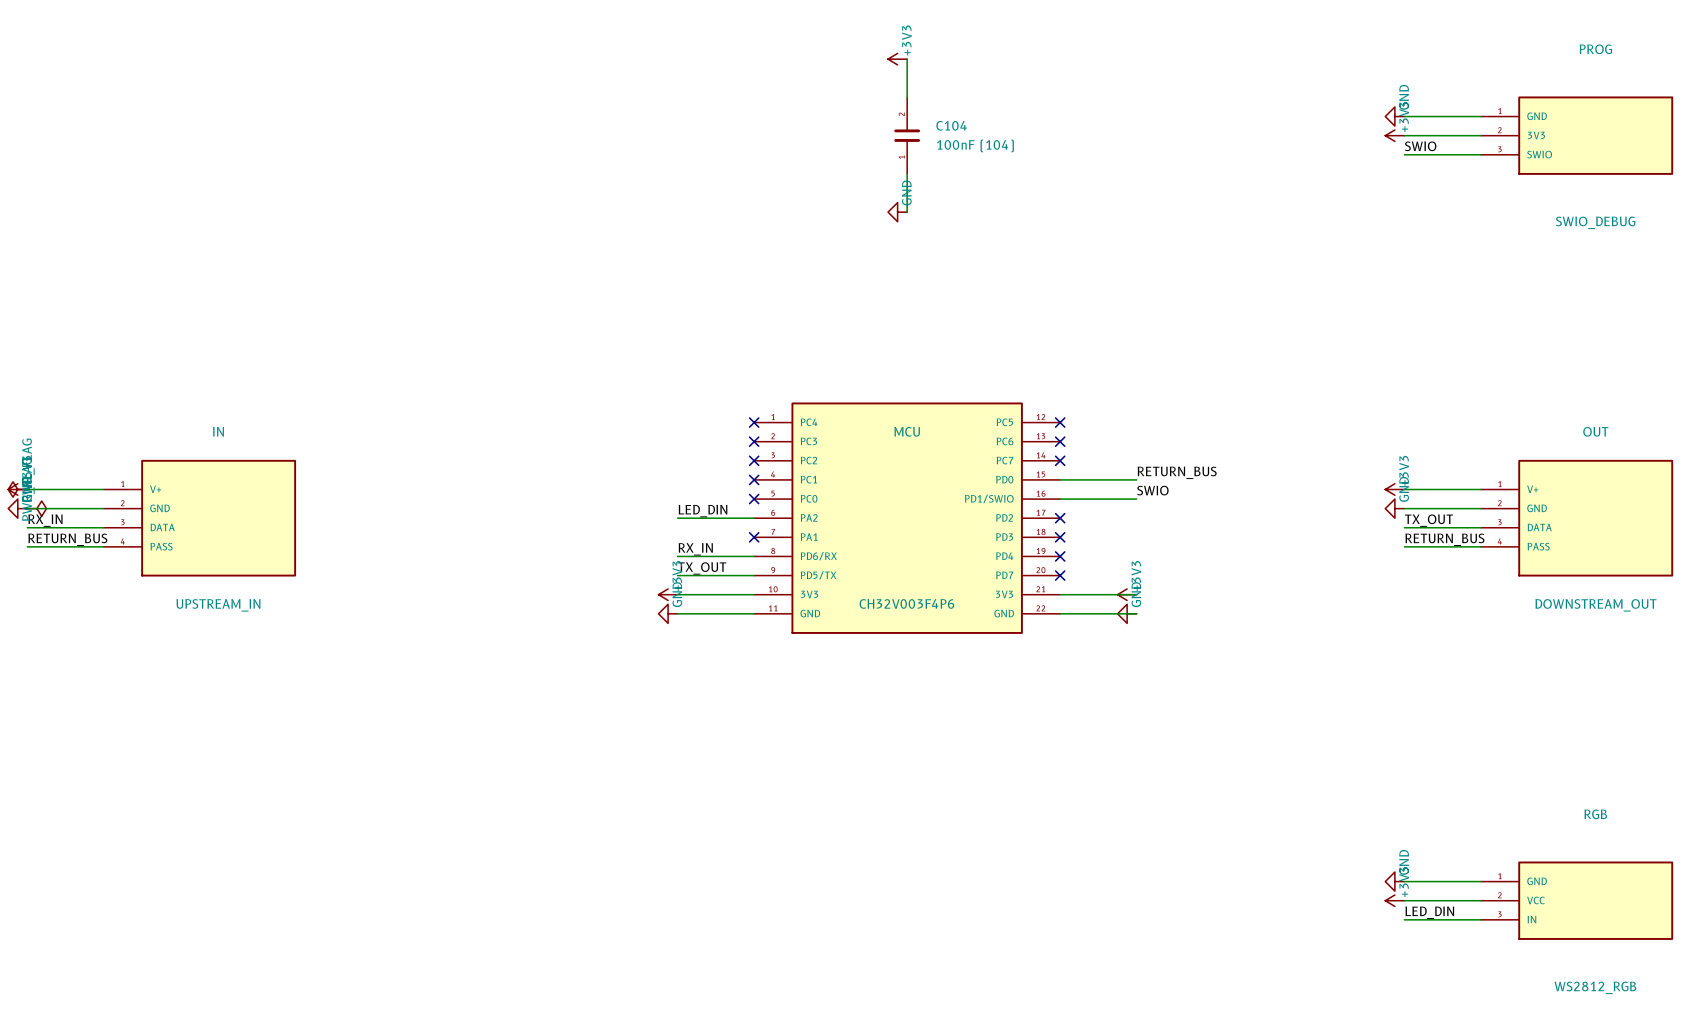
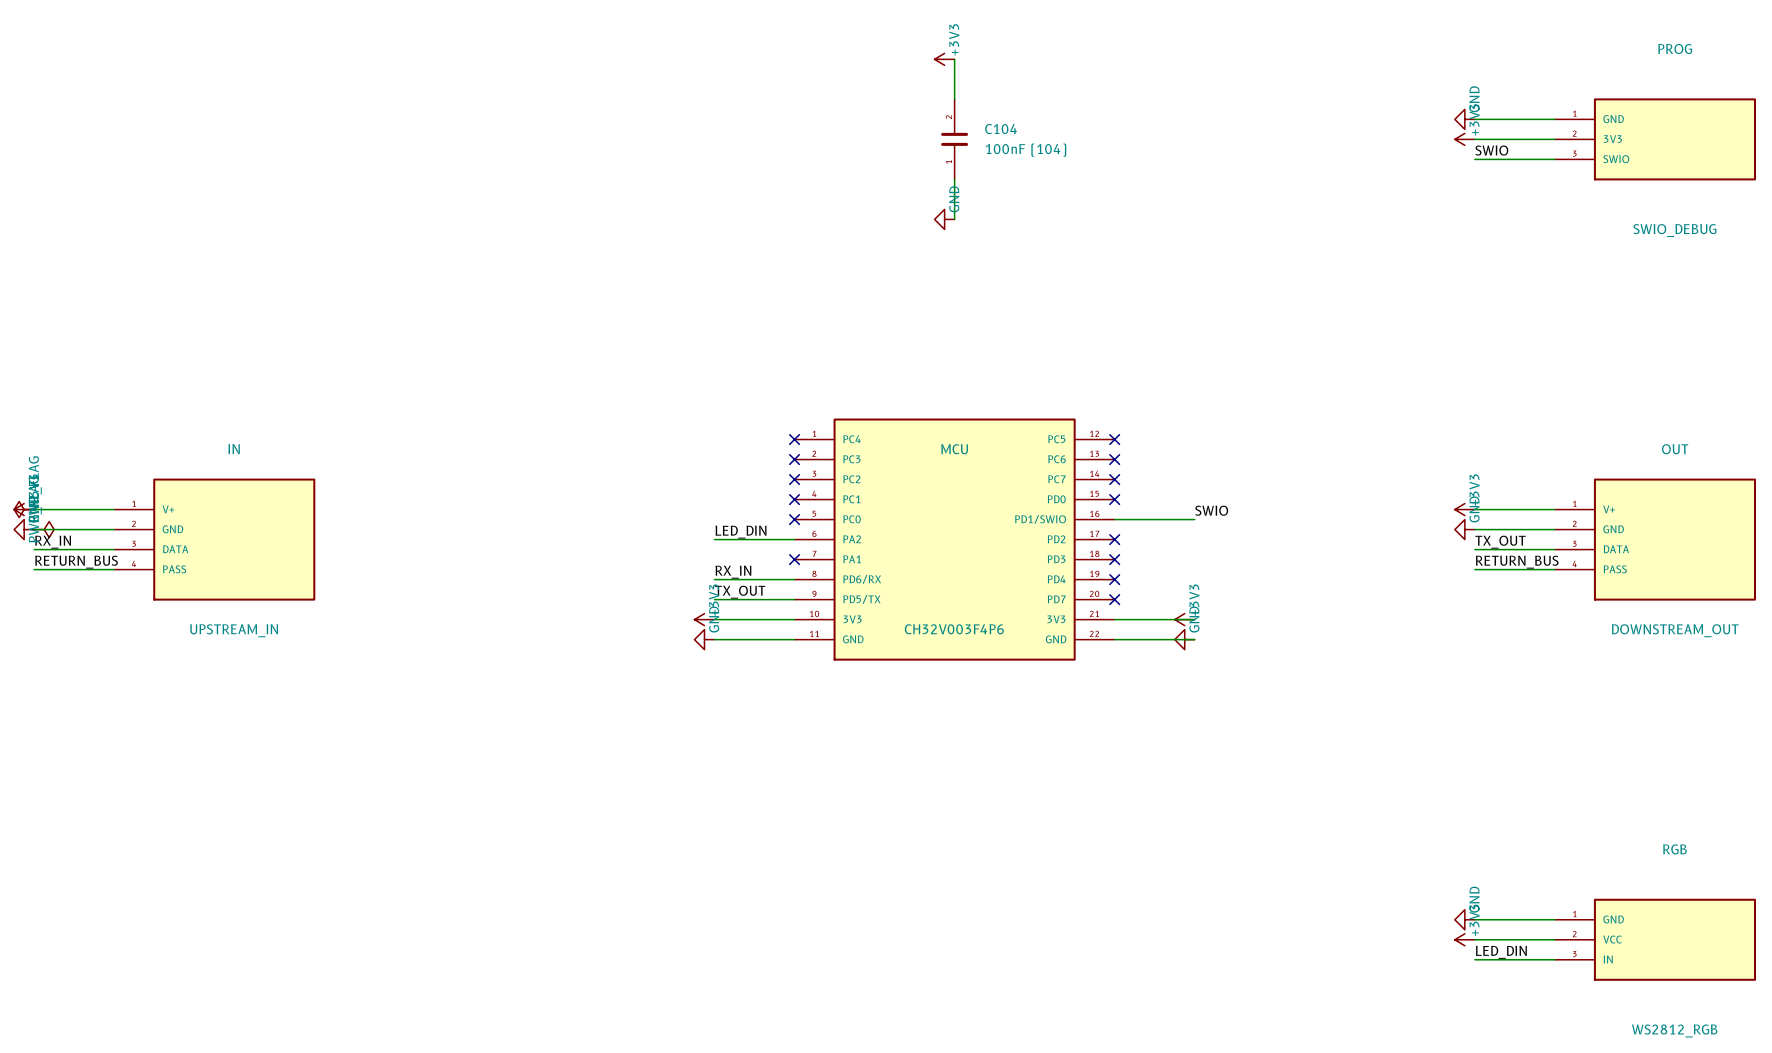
label: RETURN_BUS (1177, 472) -> none
wire: (1060, 479) (1136, 479) -> none
no-connect mark: none -> (1114, 499)

